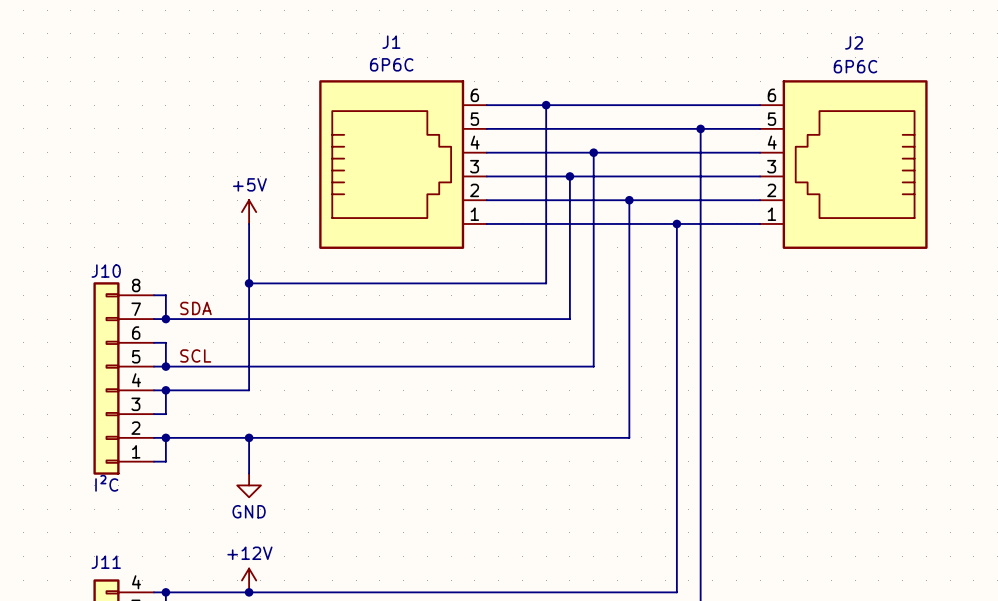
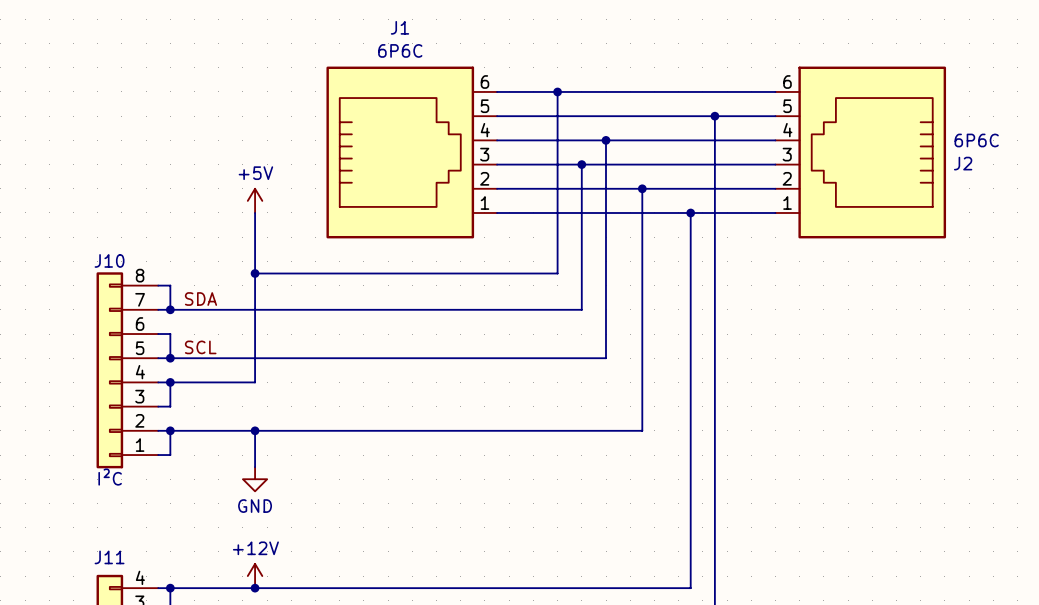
J2 name position: J2 (854, 42) -> J2 (963, 163)
J2 value position: 6P6C (855, 66) -> 6P6C (976, 140)

